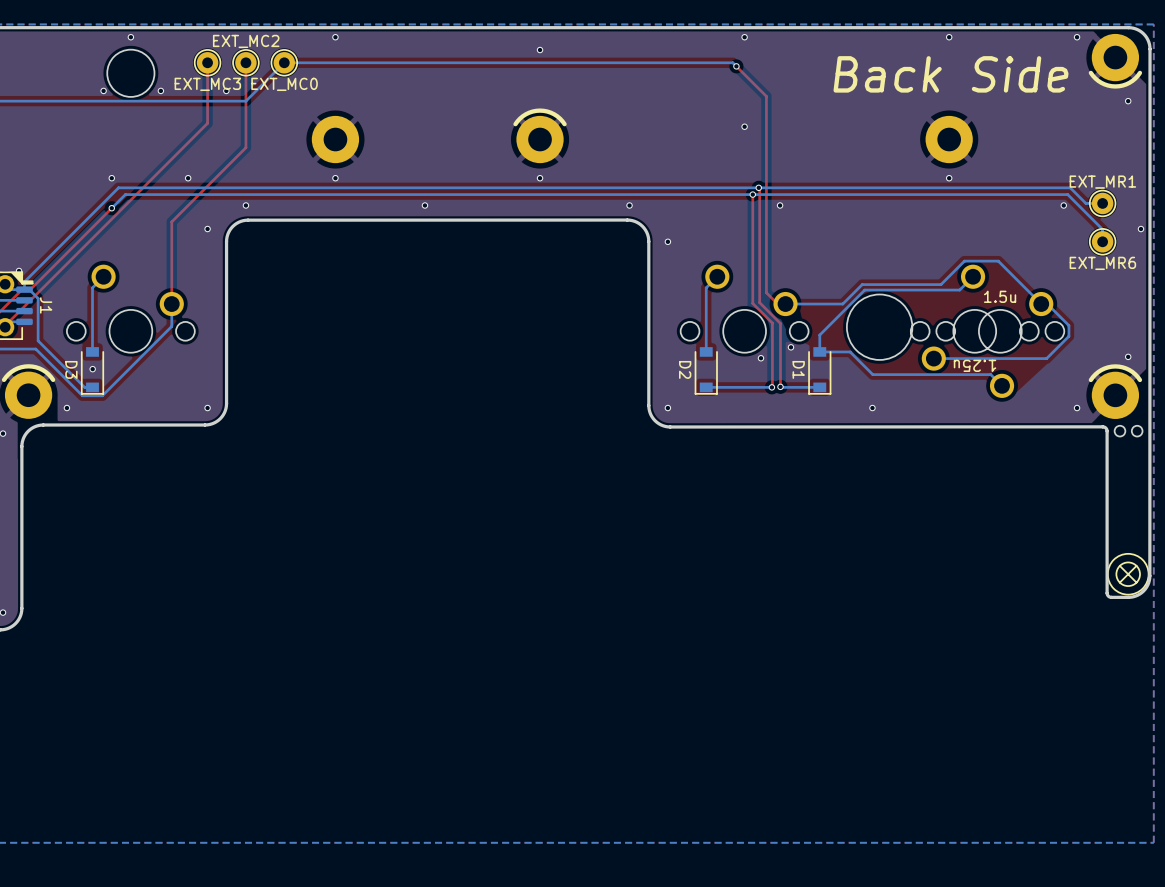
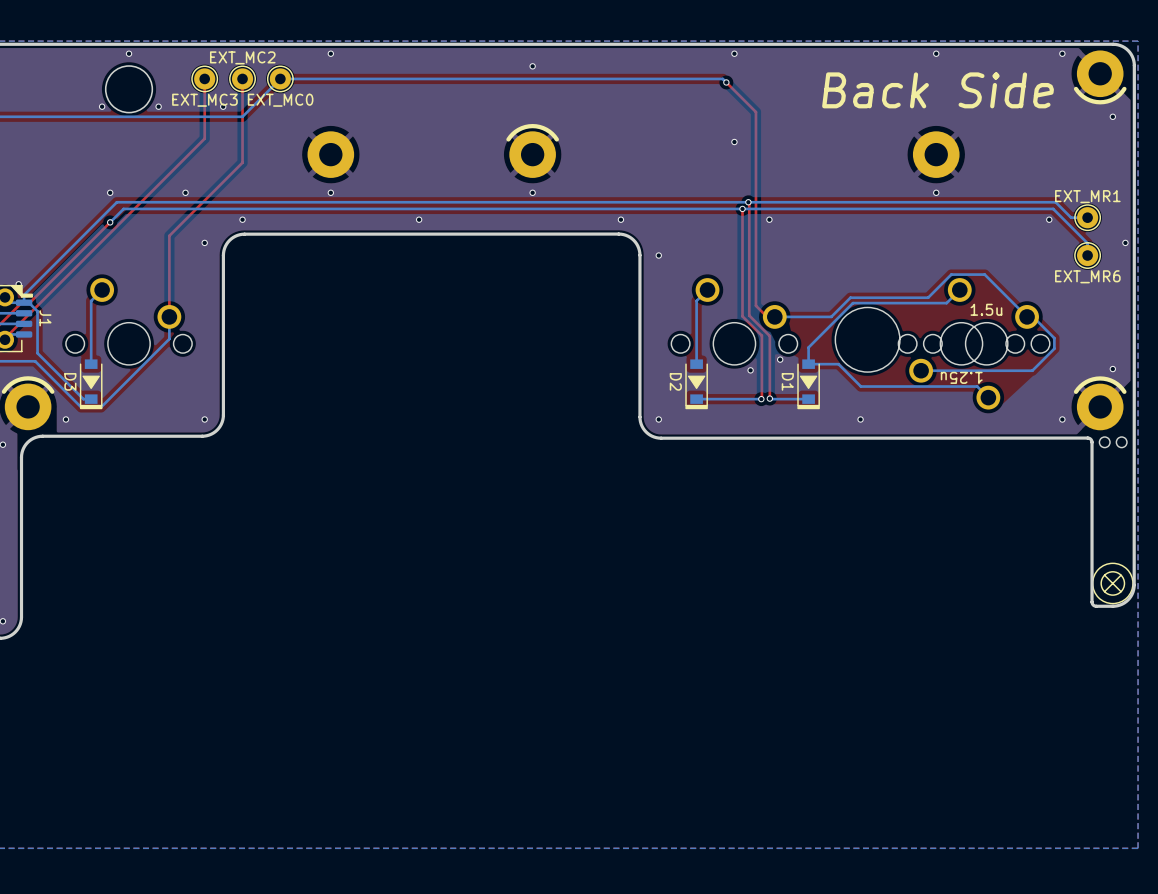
D3 footprint: [81, 347, 104, 395] -> [79, 359, 103, 410]
D2 footprint: [694, 347, 718, 395] -> [685, 359, 708, 410]
D1 footprint: [808, 347, 832, 395] -> [797, 359, 820, 410]

